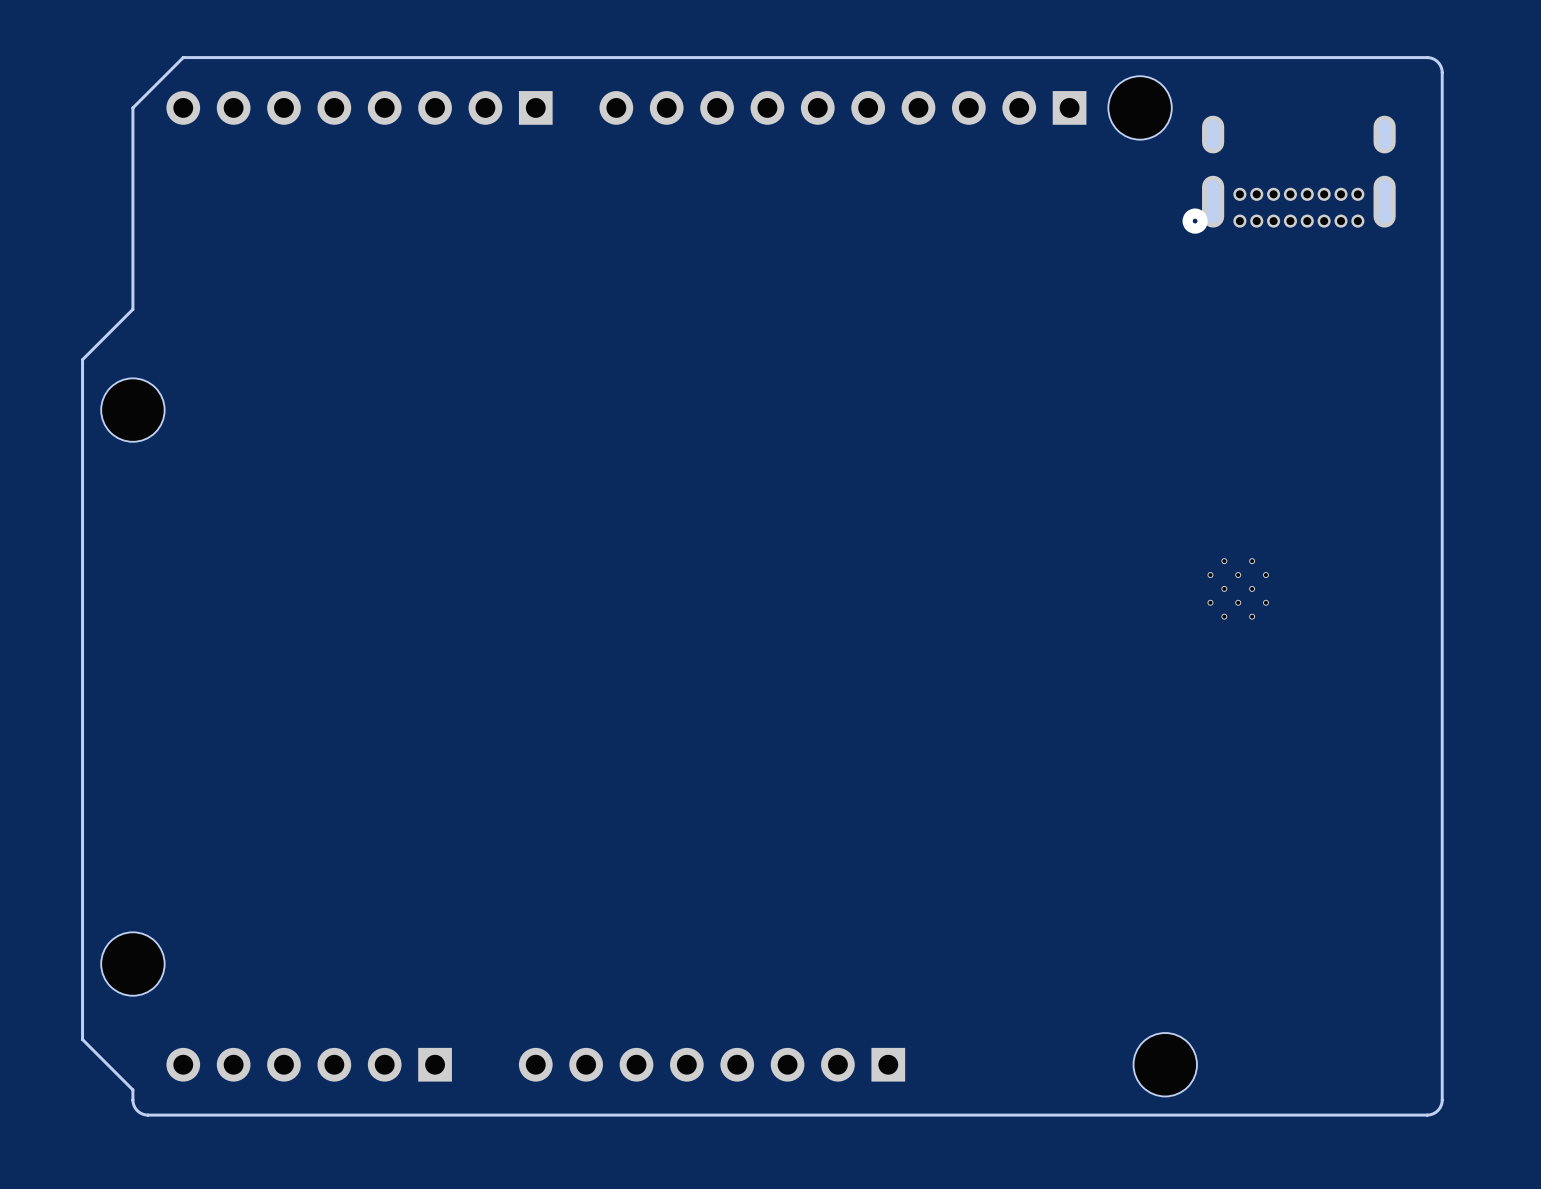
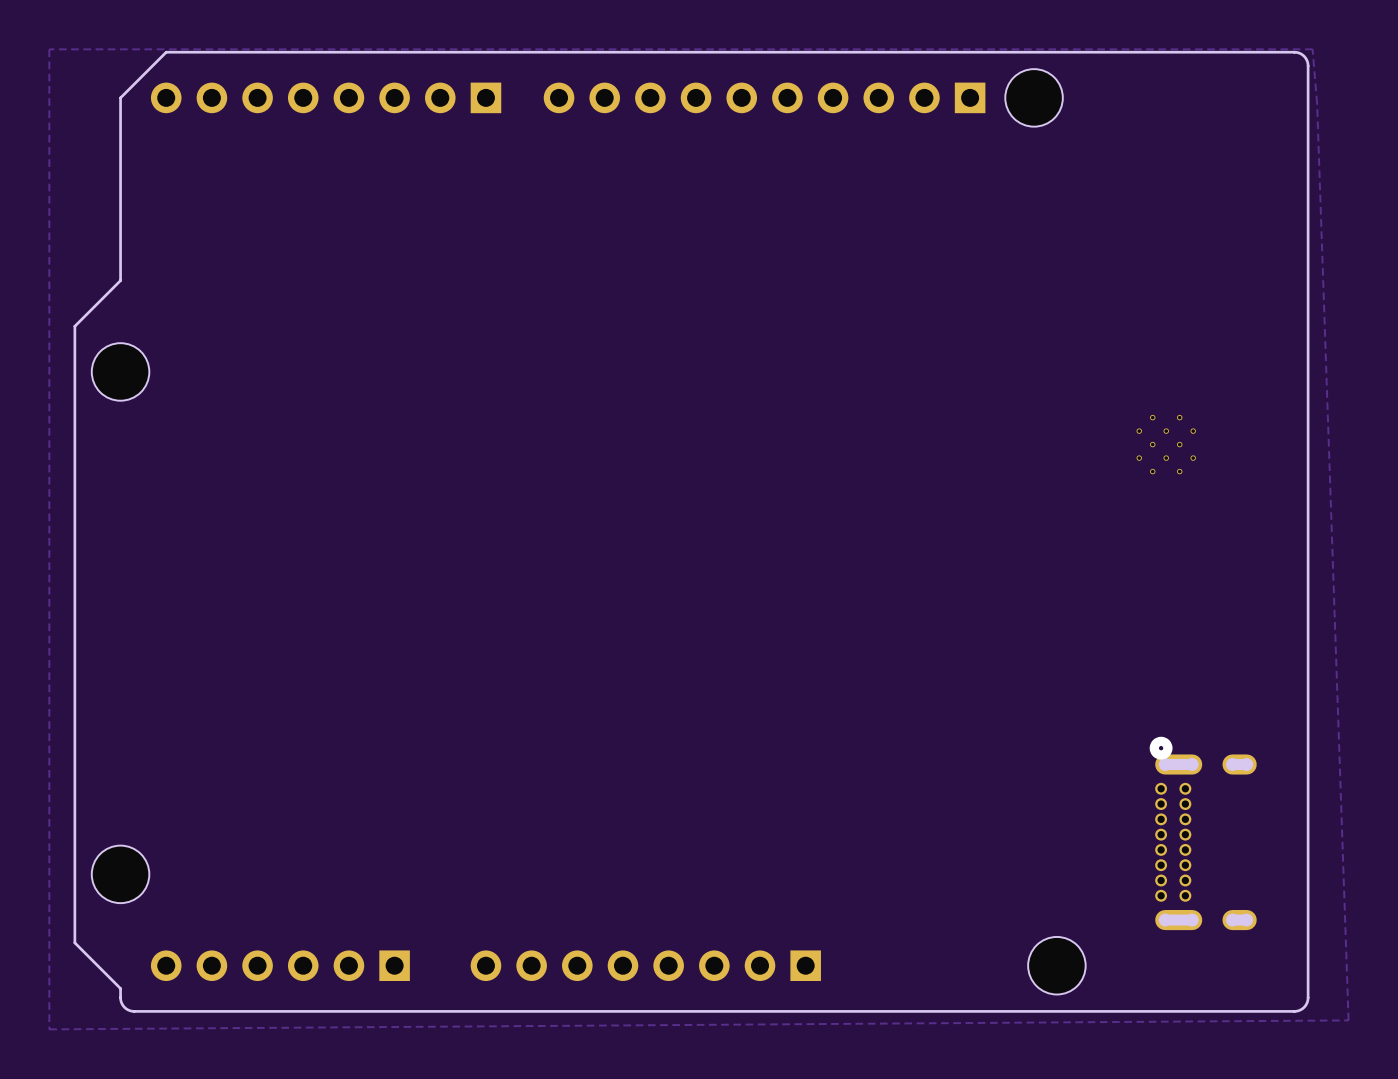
zone outline: none -> (1312, 49) (49, 49) (49, 1029) (1348, 1020) (1317, 103) (1312, 49)
part: (1289, 174) -> none
part: none -> (1166, 444)
part: (1238, 588) -> none
part: none -> (1203, 833)

